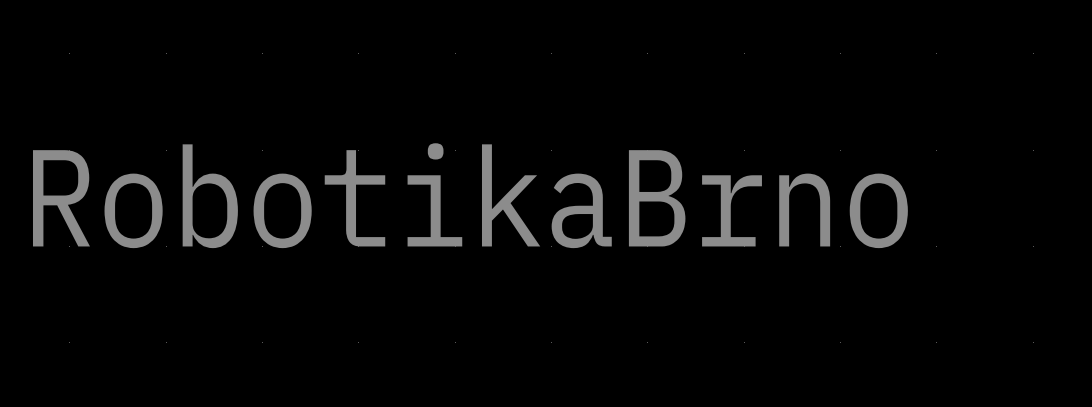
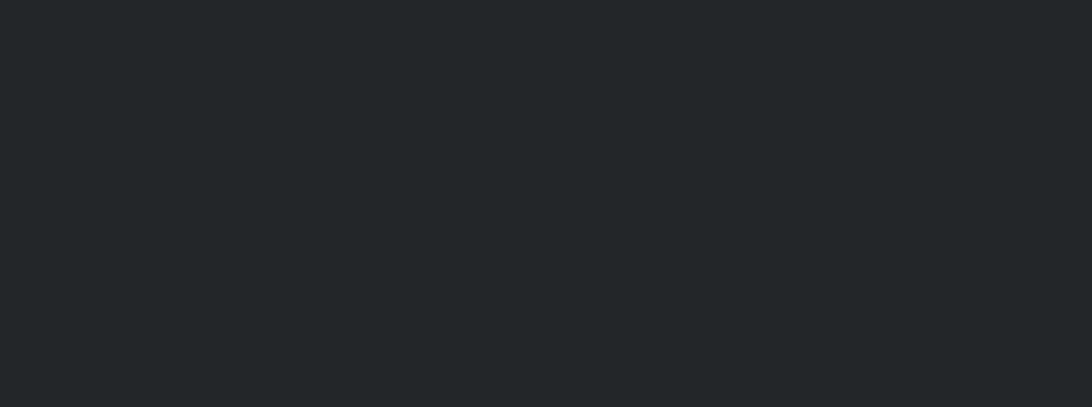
text: RobotikaBrno (470, 195) -> none

